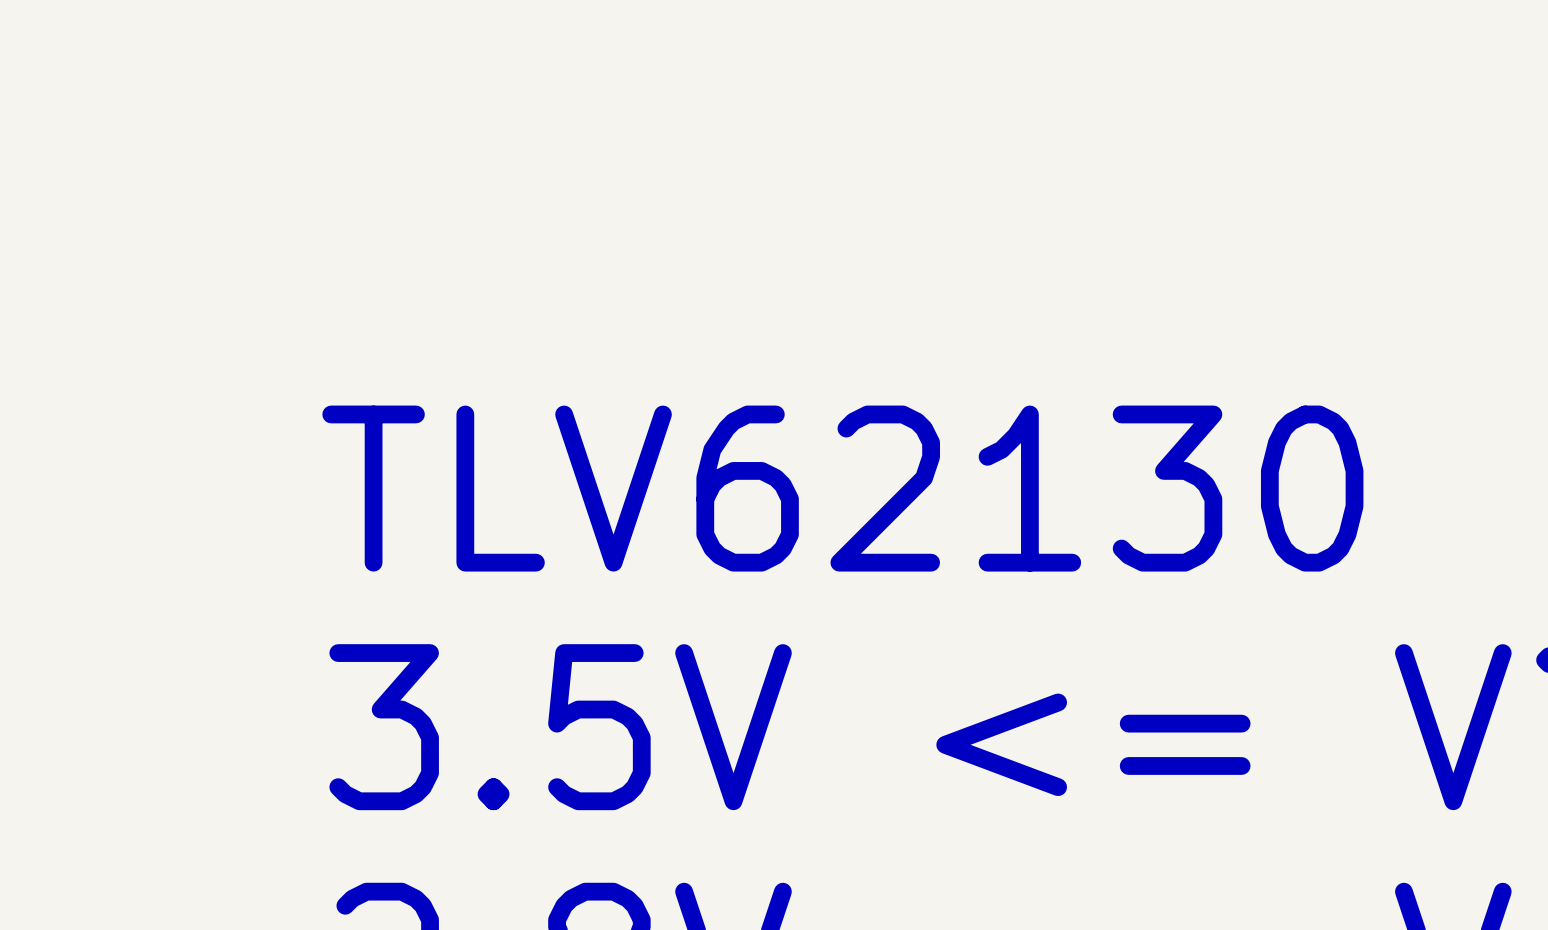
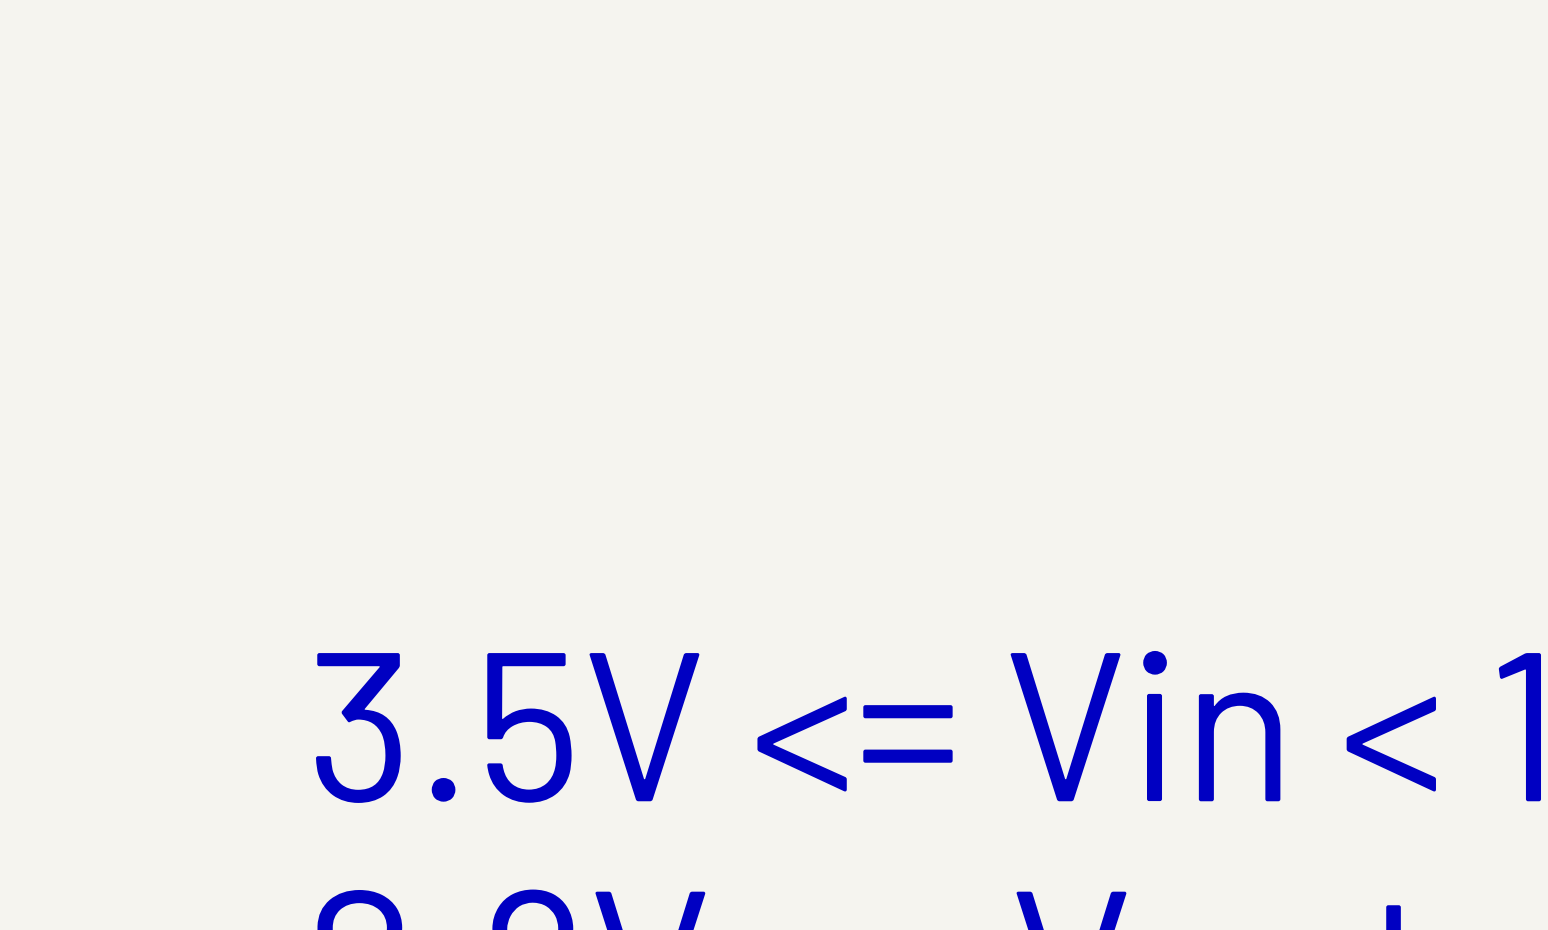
text: TLV62130 (842, 488) -> none

